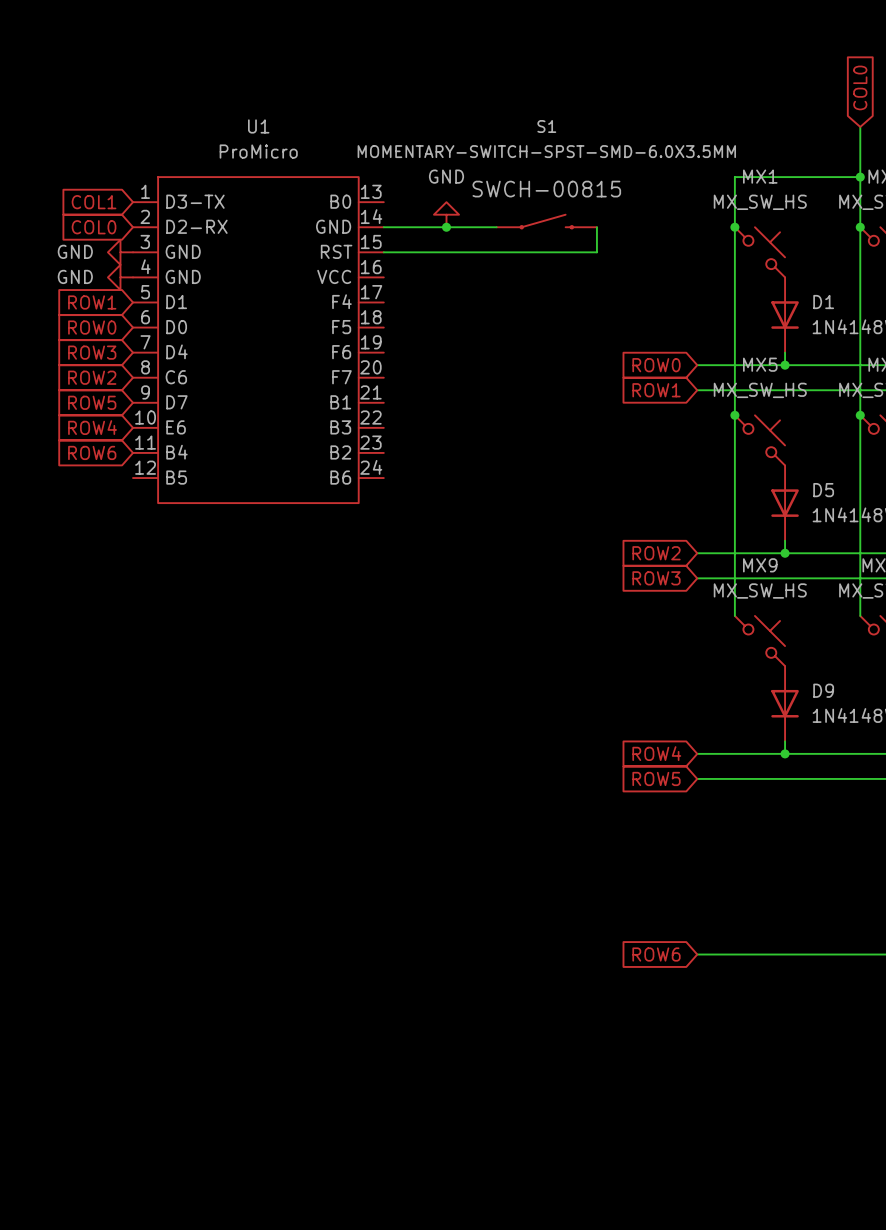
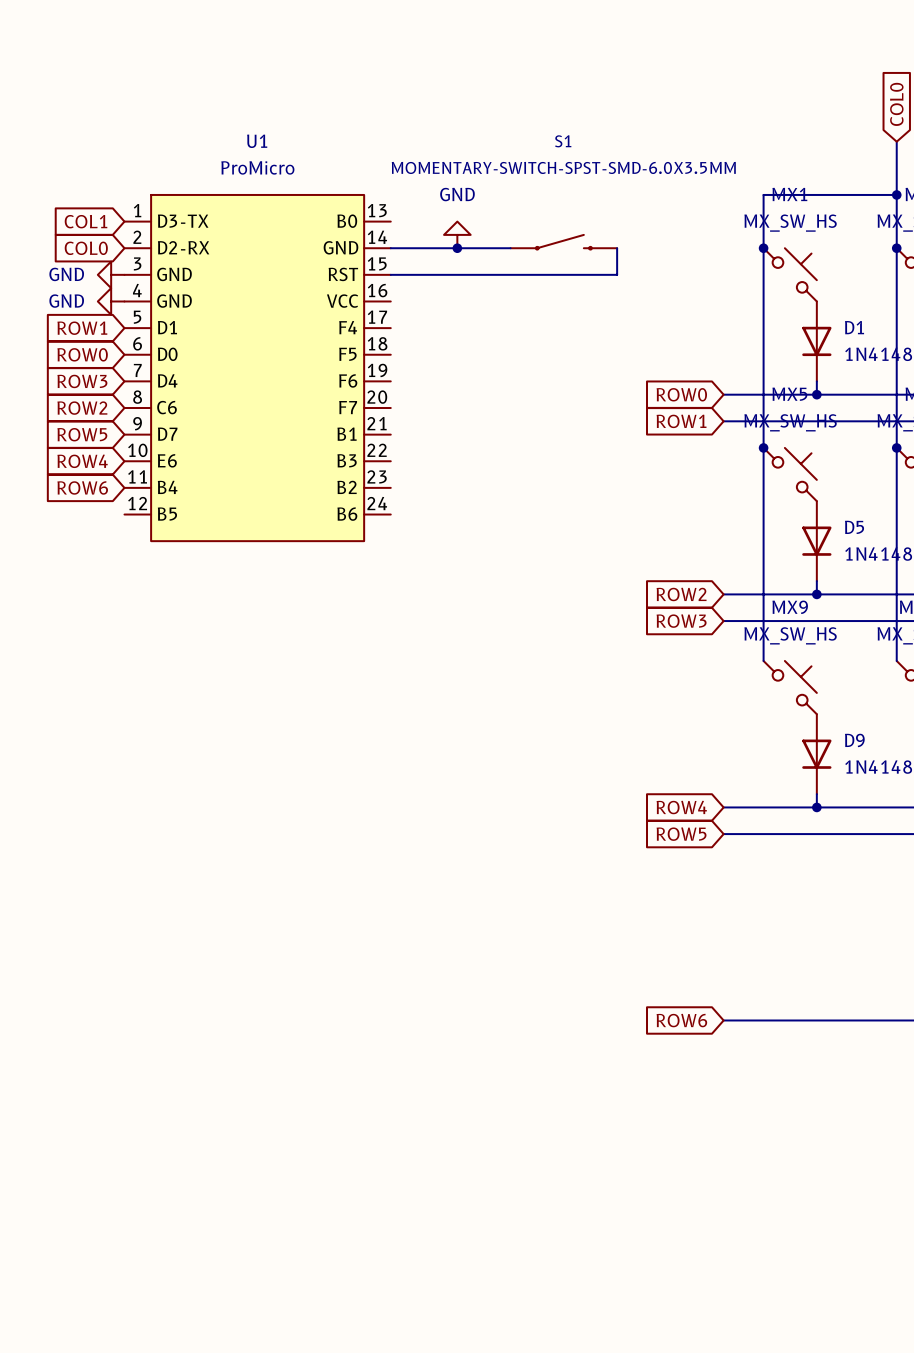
S1 text: SWCH-00815 (546, 189) -> none

